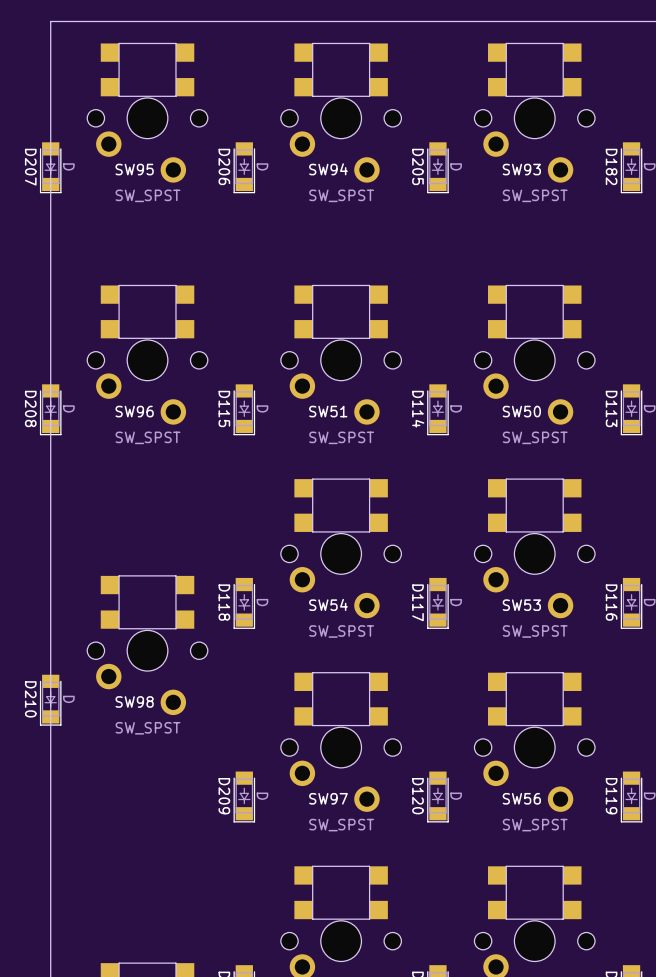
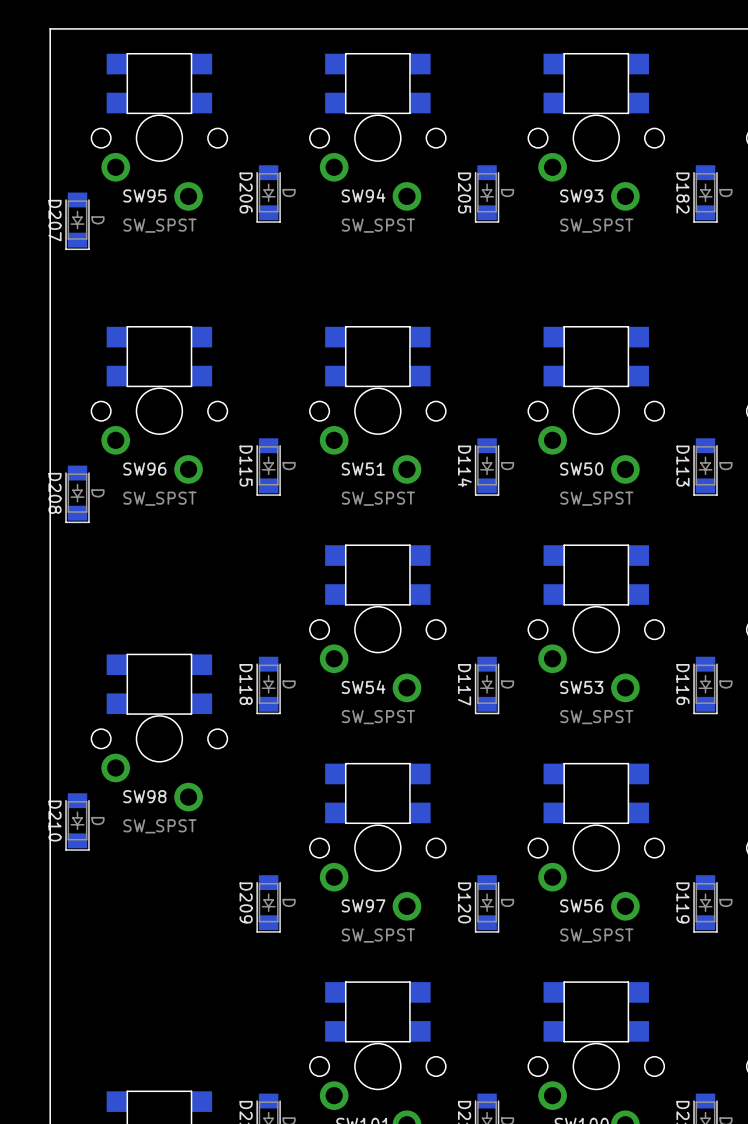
D207 position: (50, 167) -> (77, 221)
D208 position: (50, 409) -> (77, 494)
D210 position: (50, 700) -> (77, 821)

